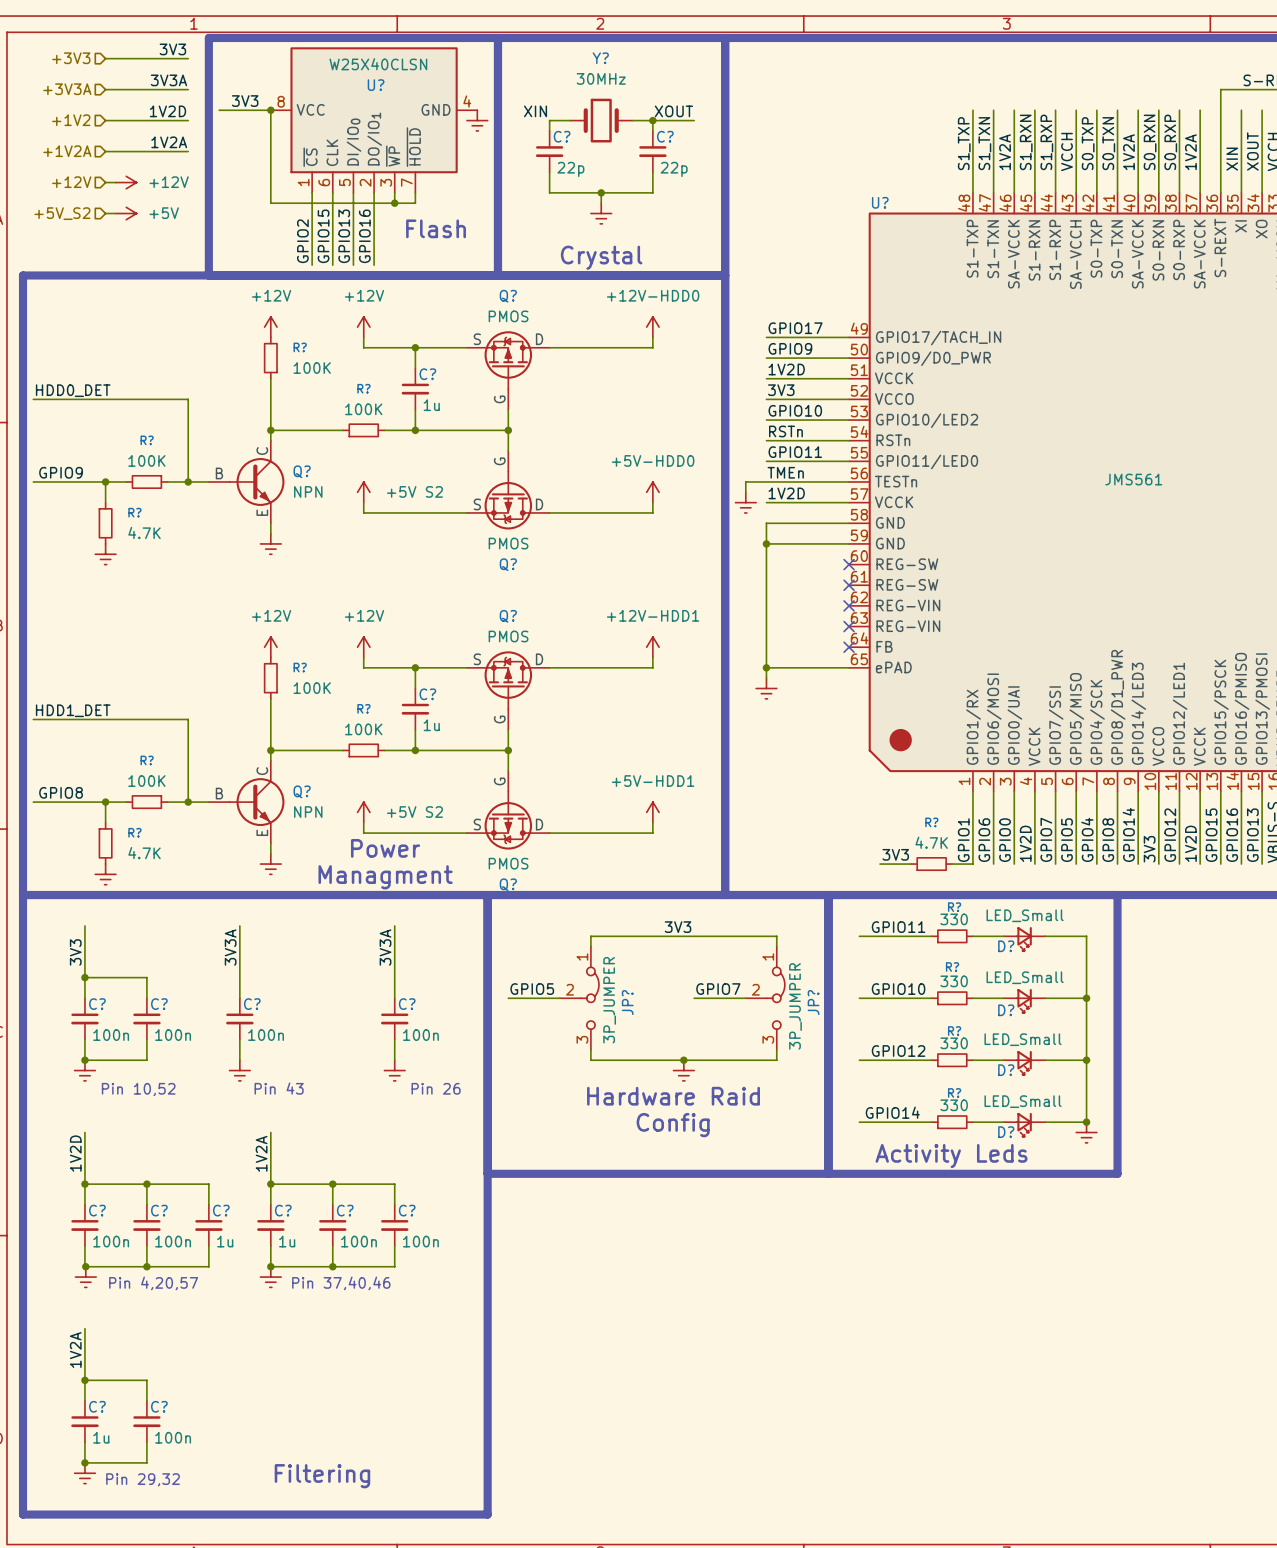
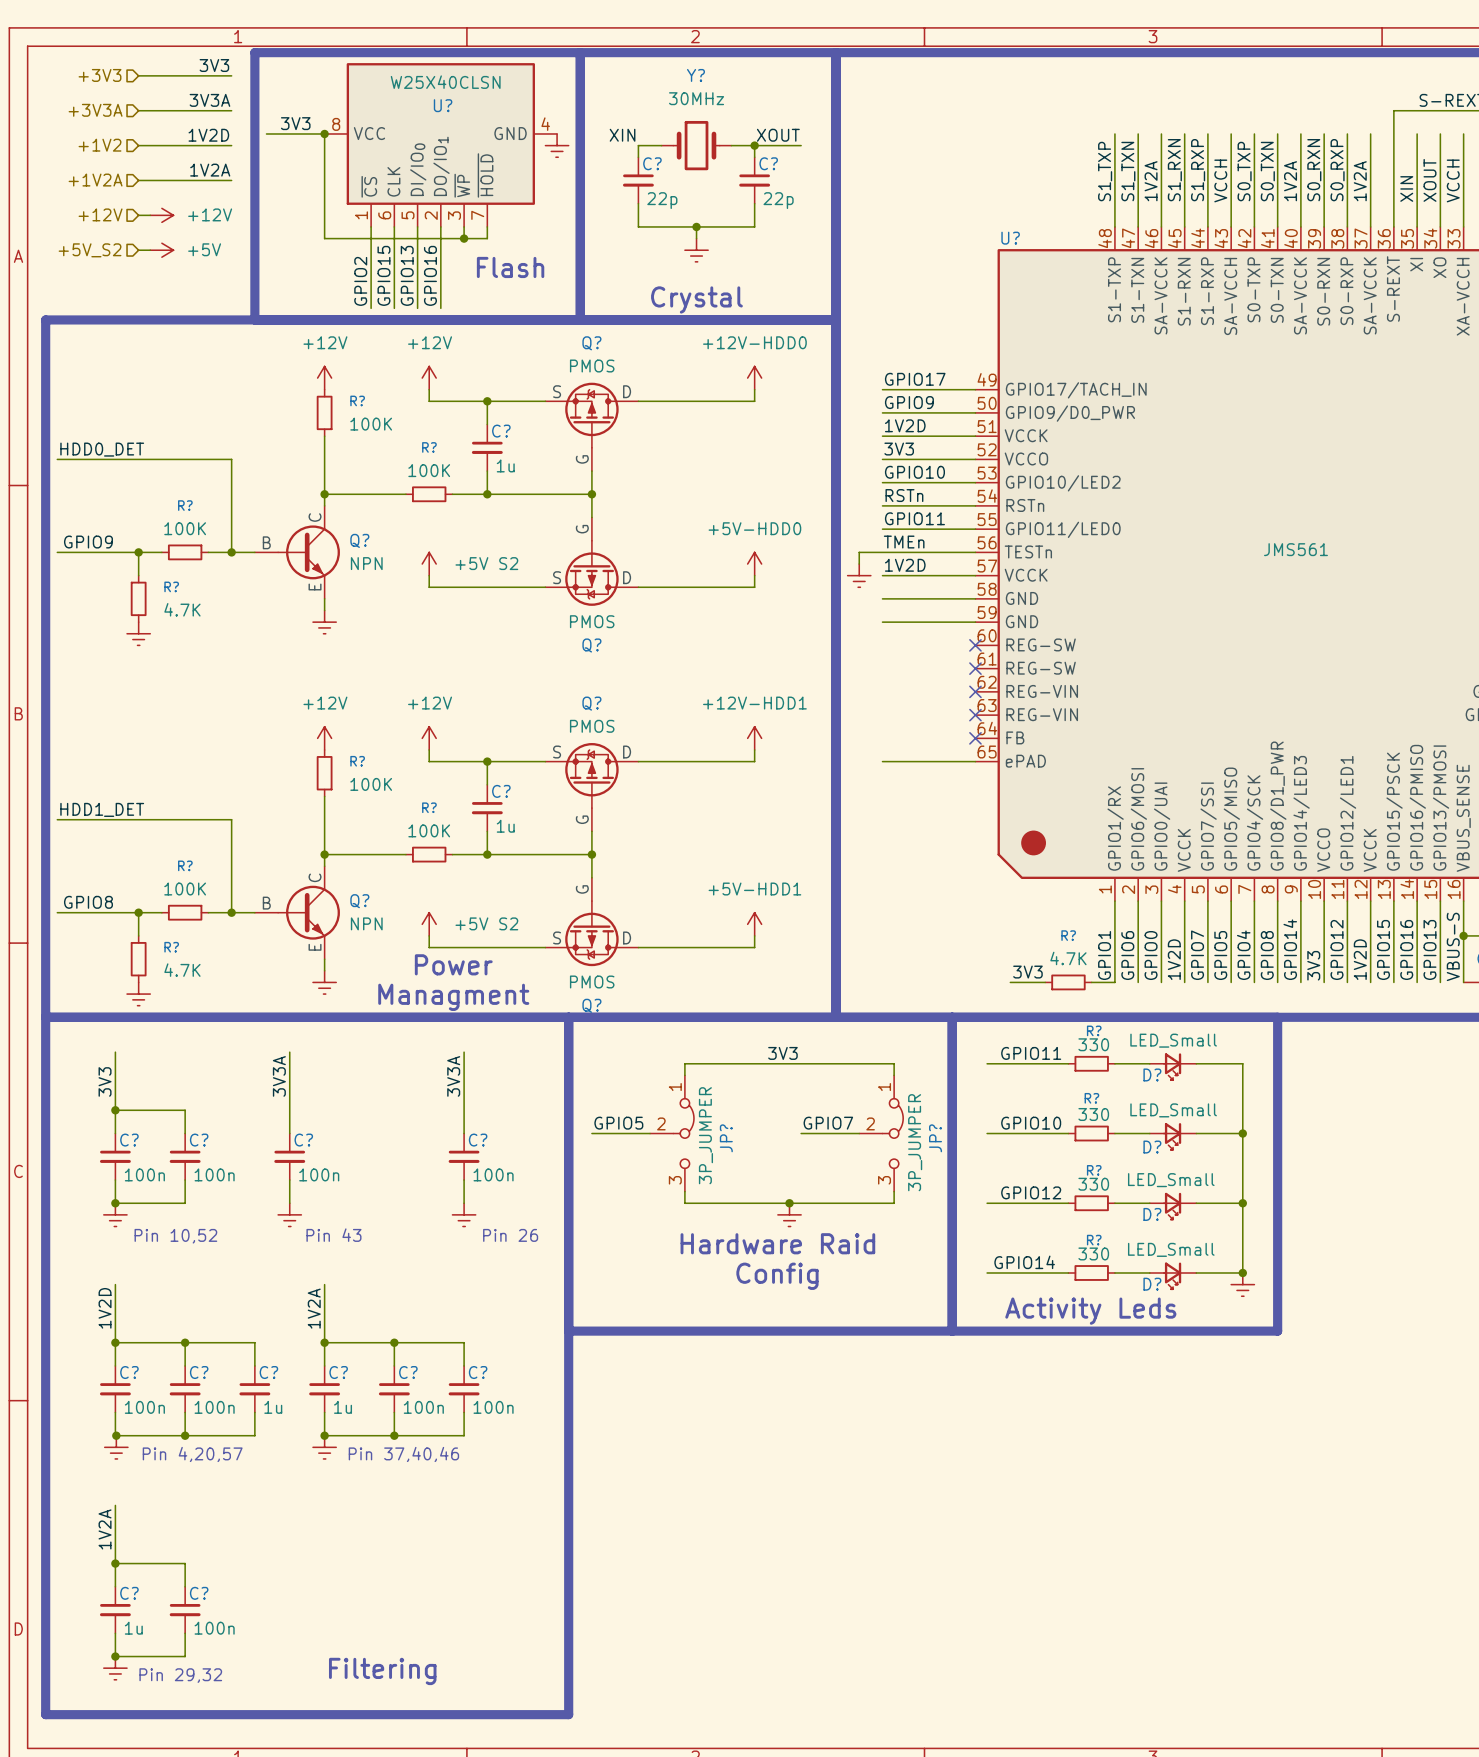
wire: (766, 523) (766, 678) -> none
junction: (766, 543) -> none
junction: (766, 667) -> none
power symbol: (766, 688) -> none

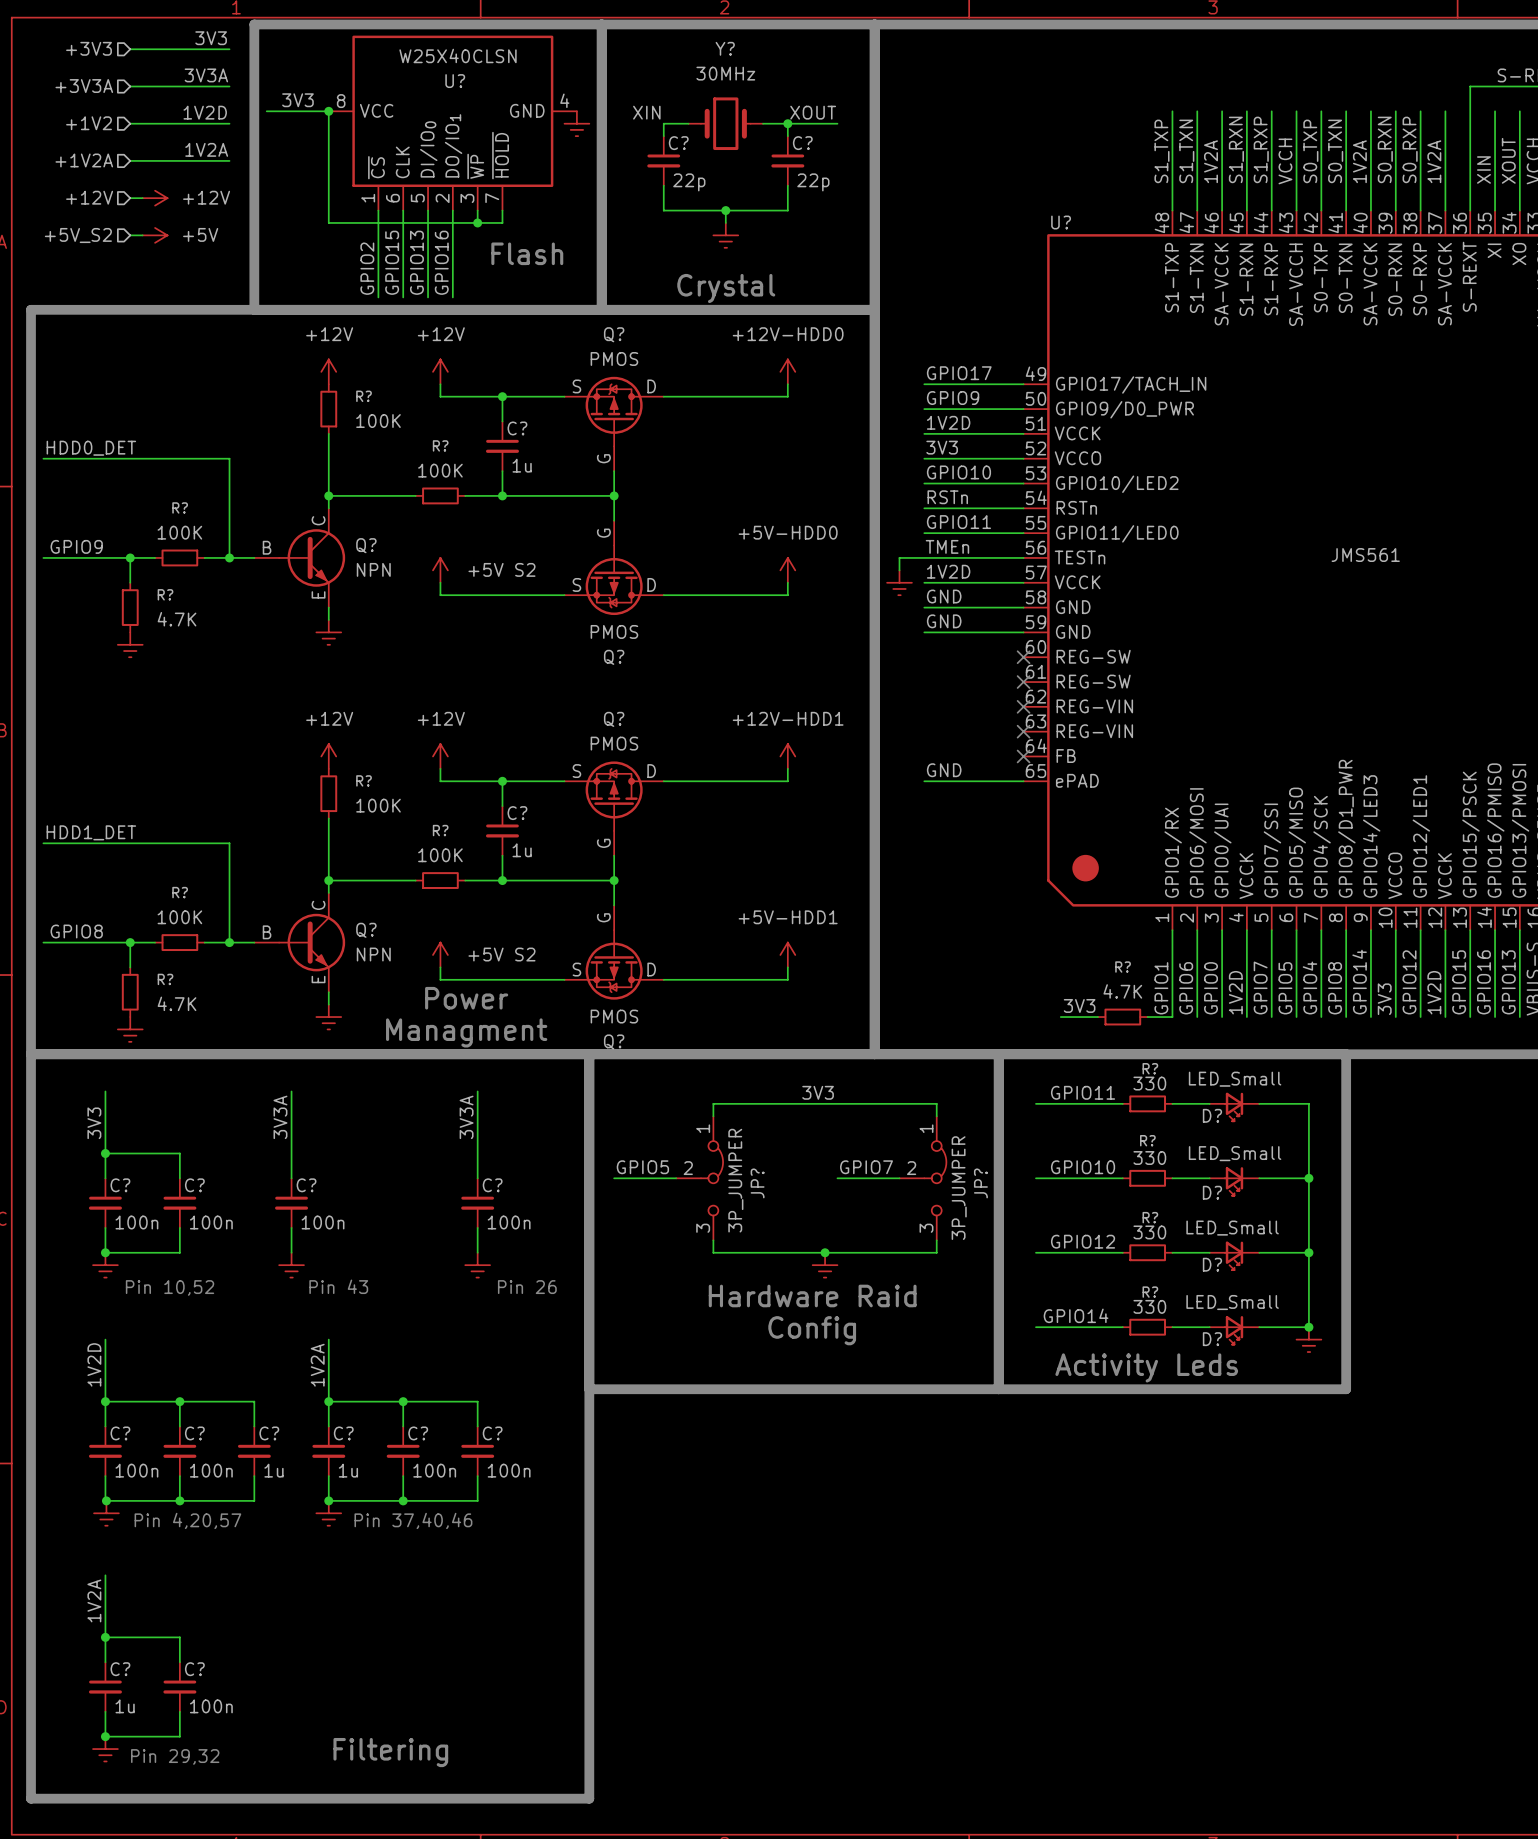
label: none -> GND (944, 596)
label: none -> GND (944, 621)
label: none -> GND (944, 770)

